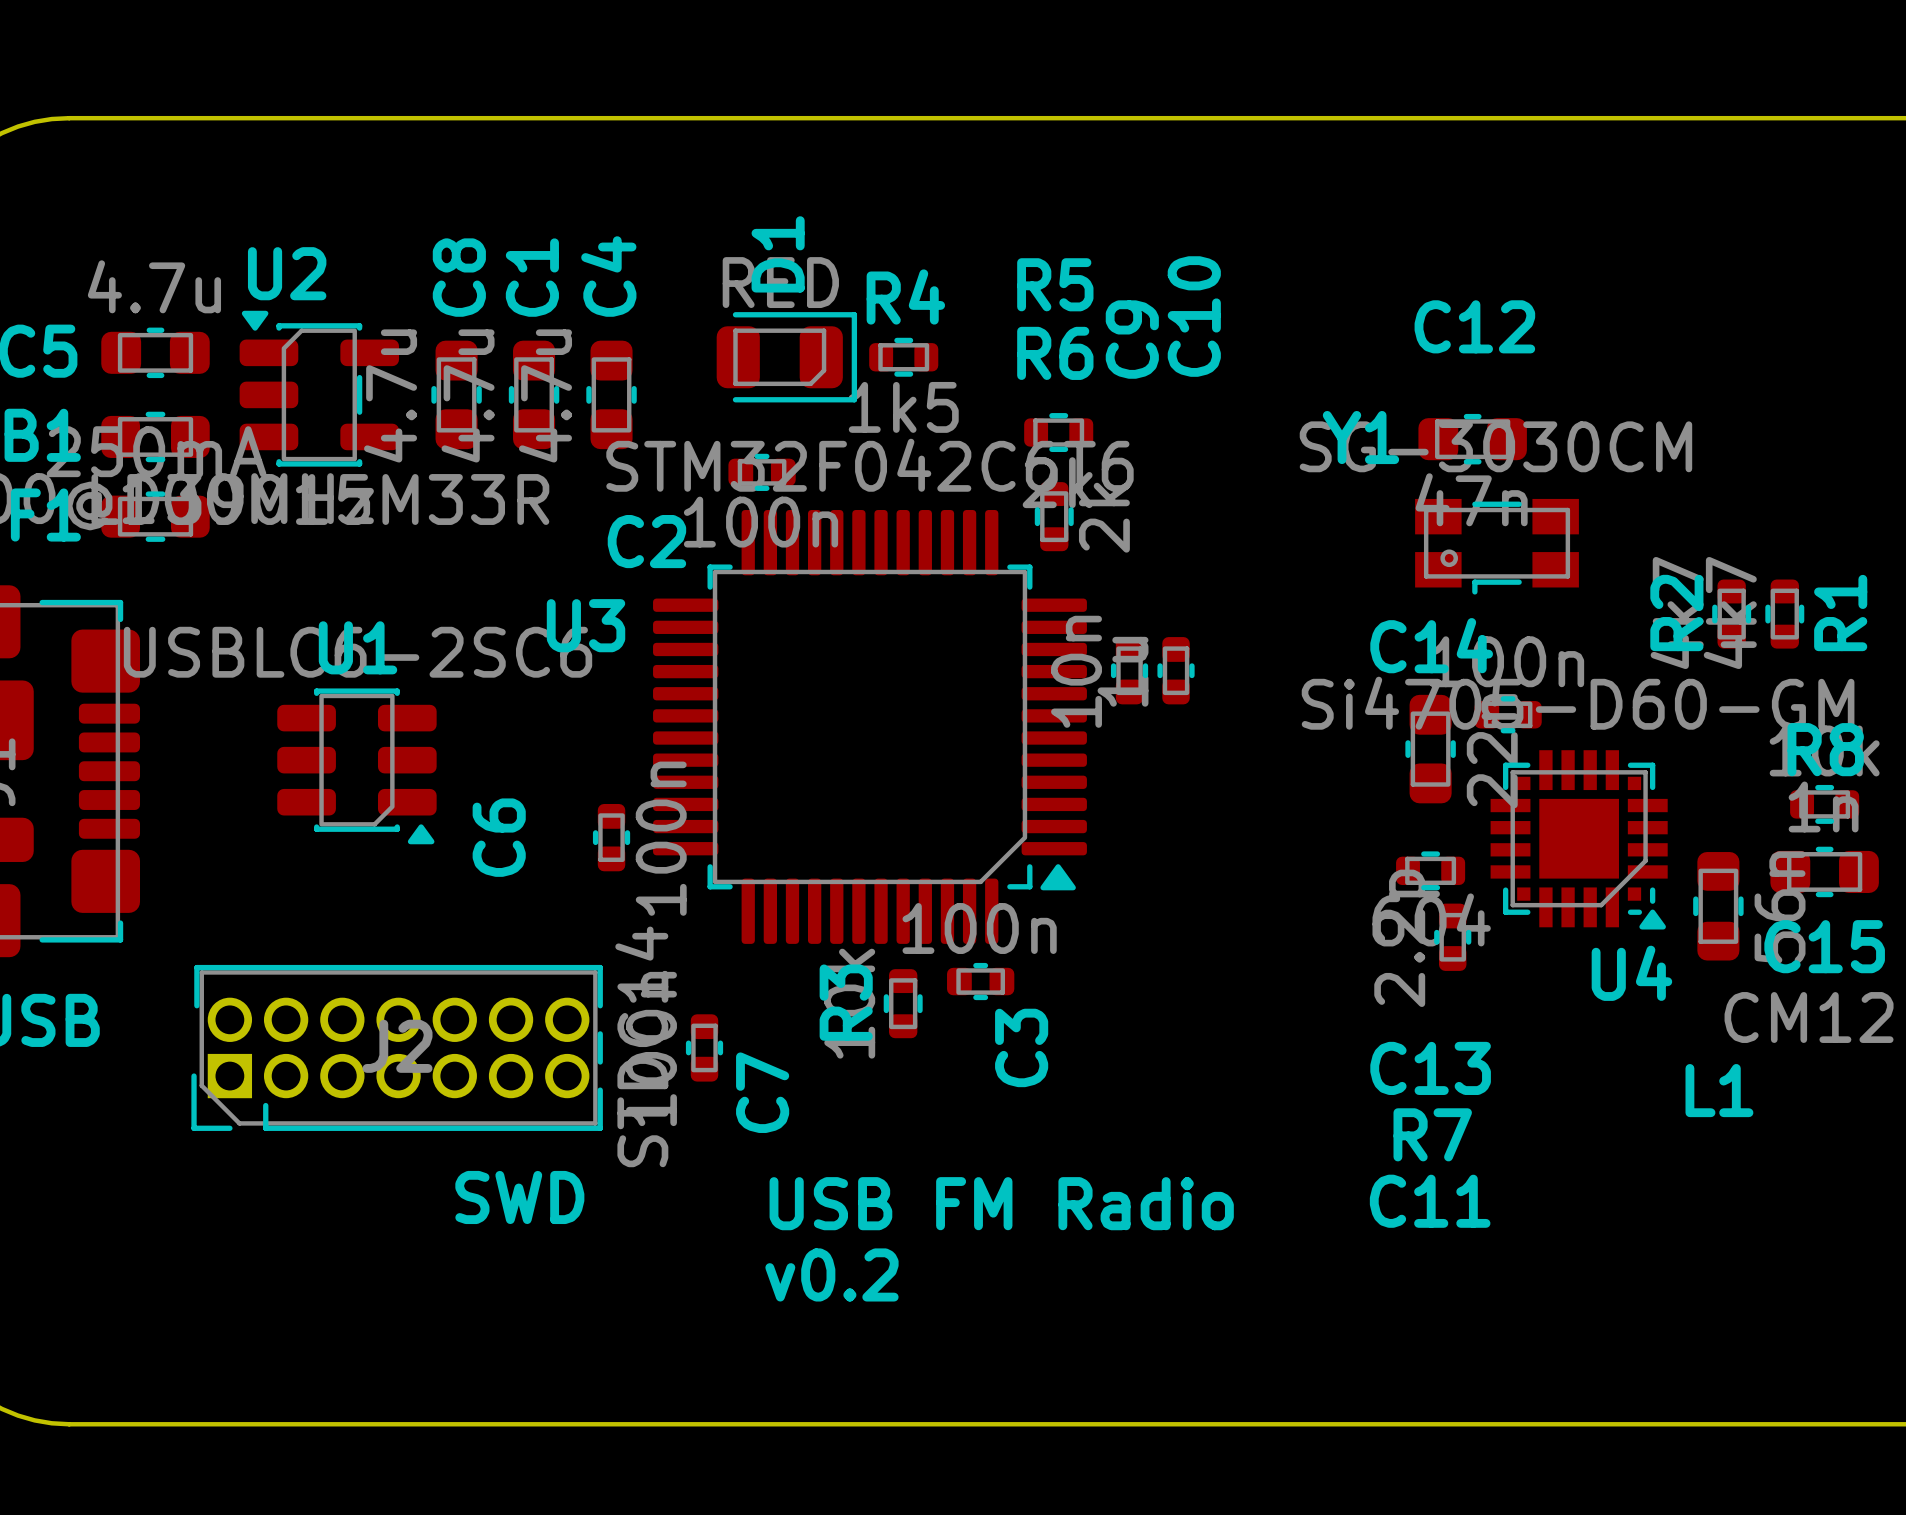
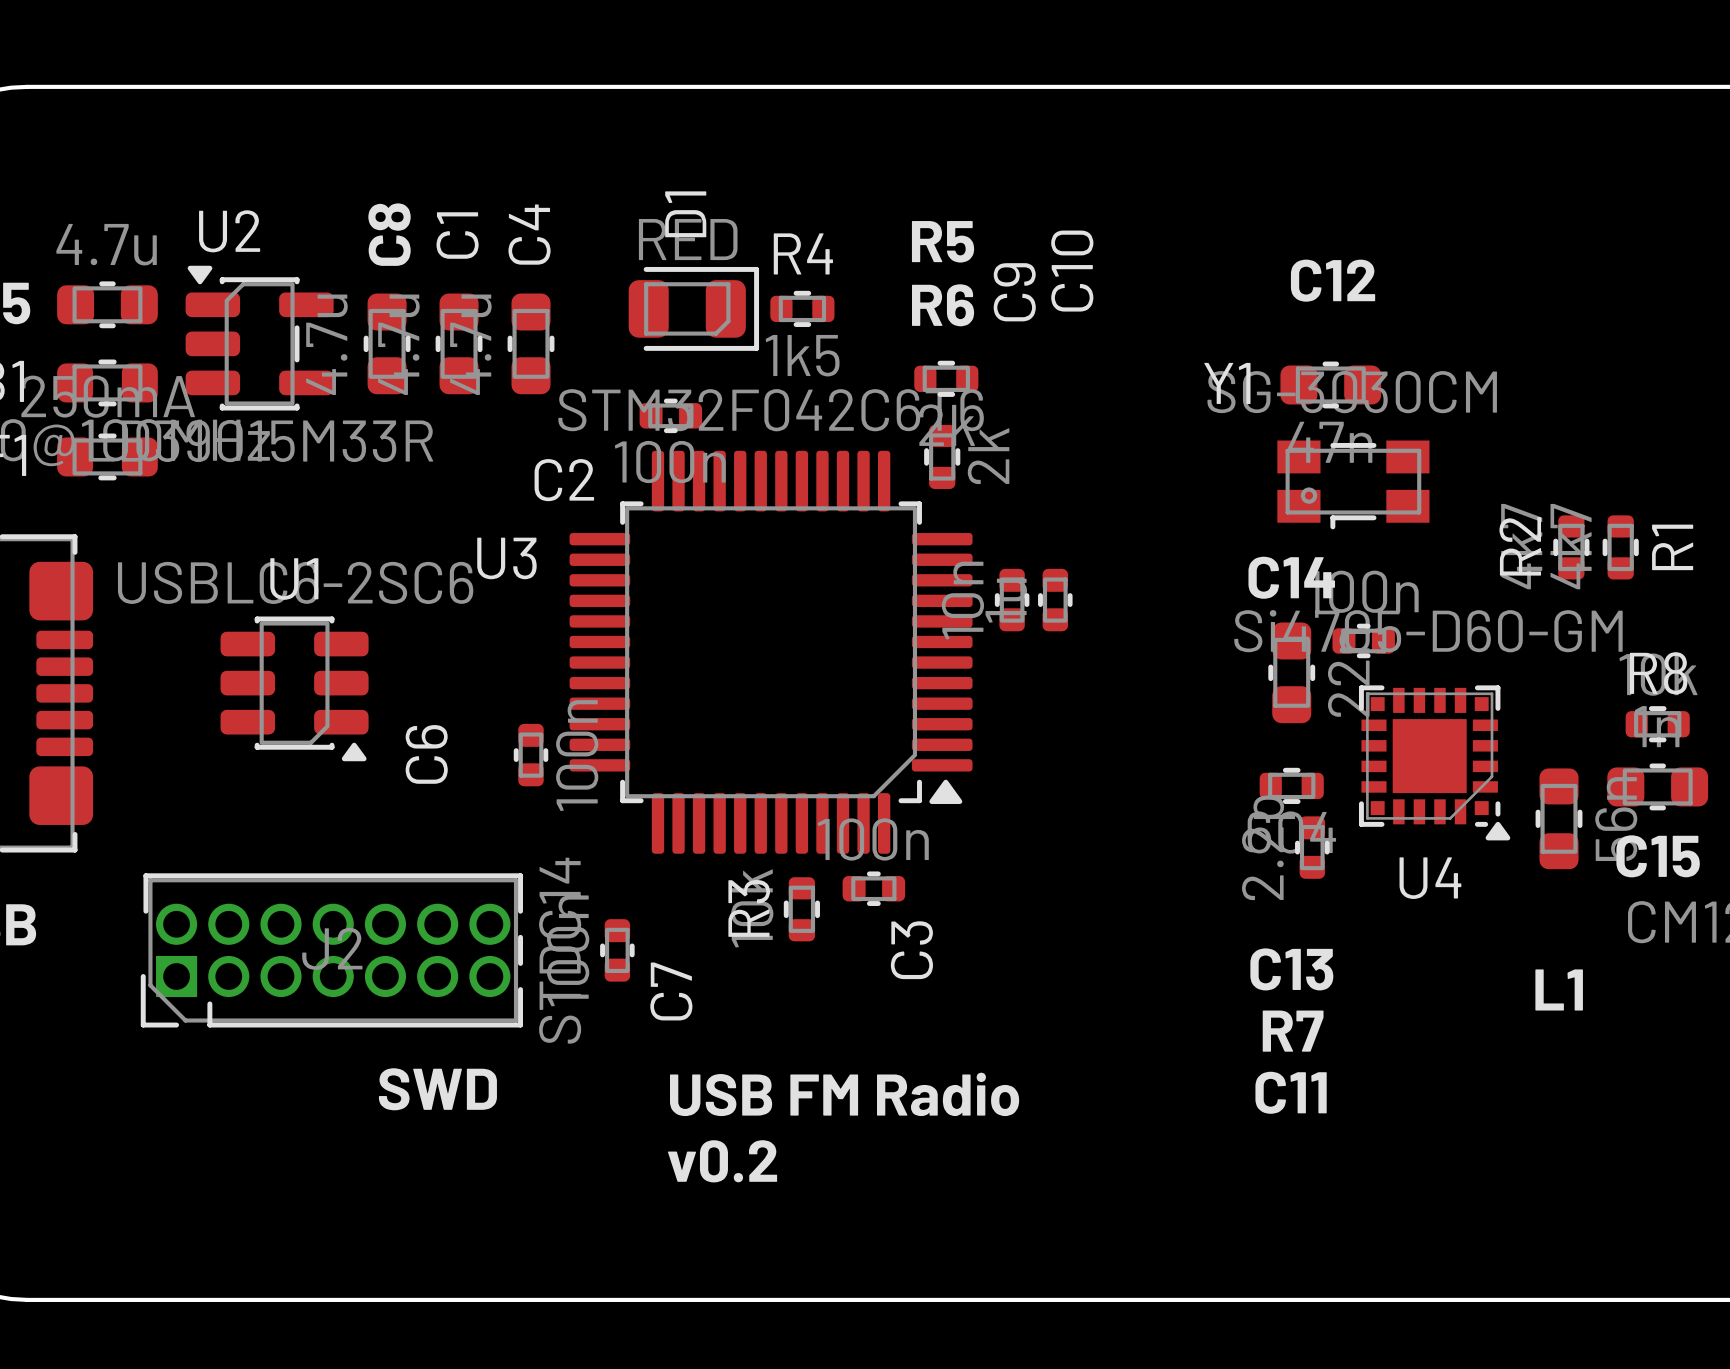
U4 footprint: [1490, 750, 1668, 930] -> [1358, 685, 1511, 841]
U4 name position: U4 (1631, 973) -> U4 (1430, 878)

